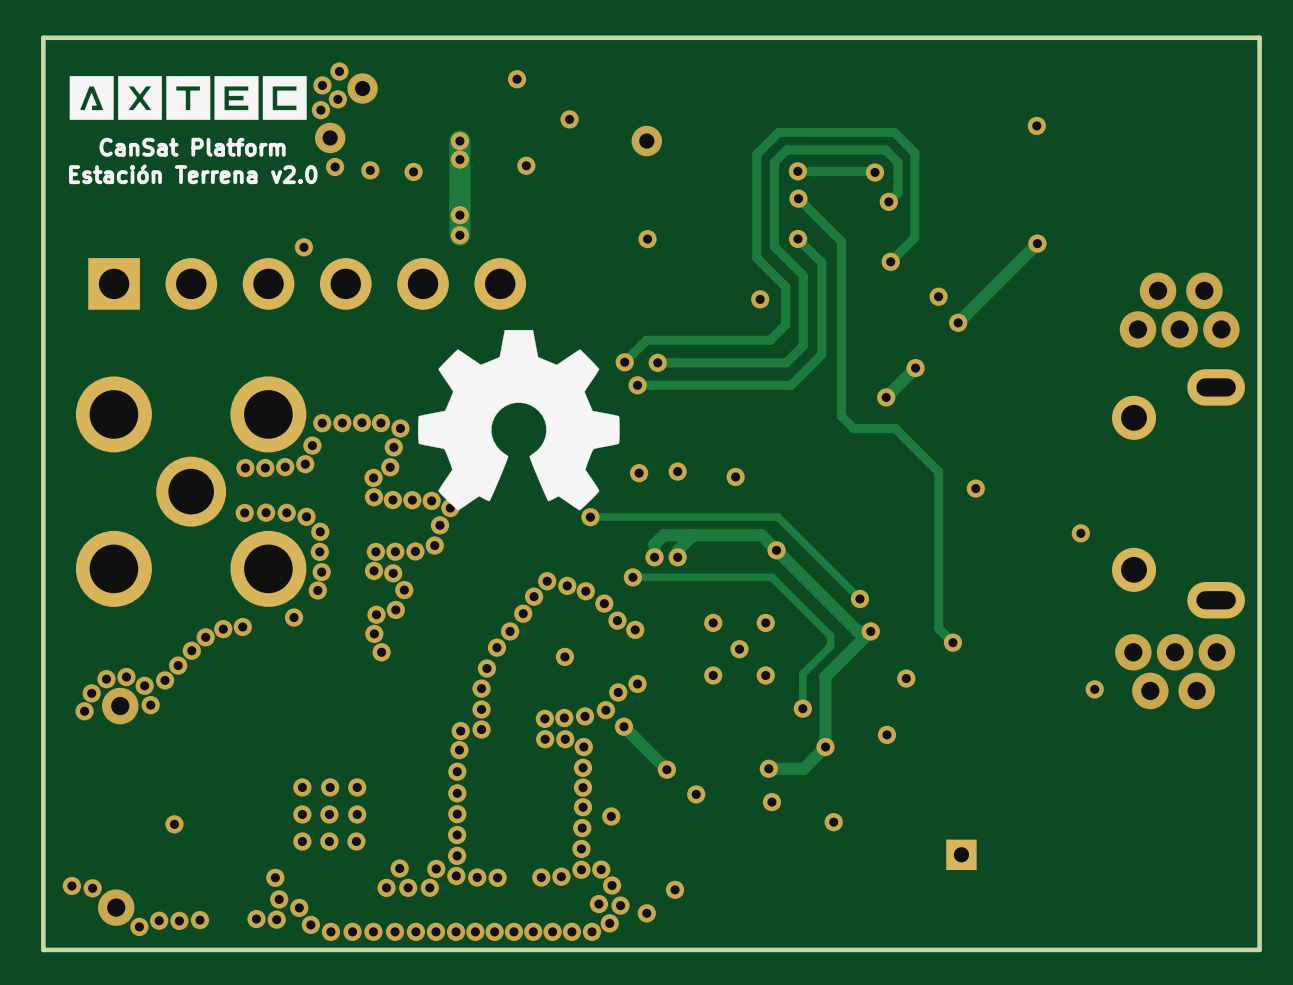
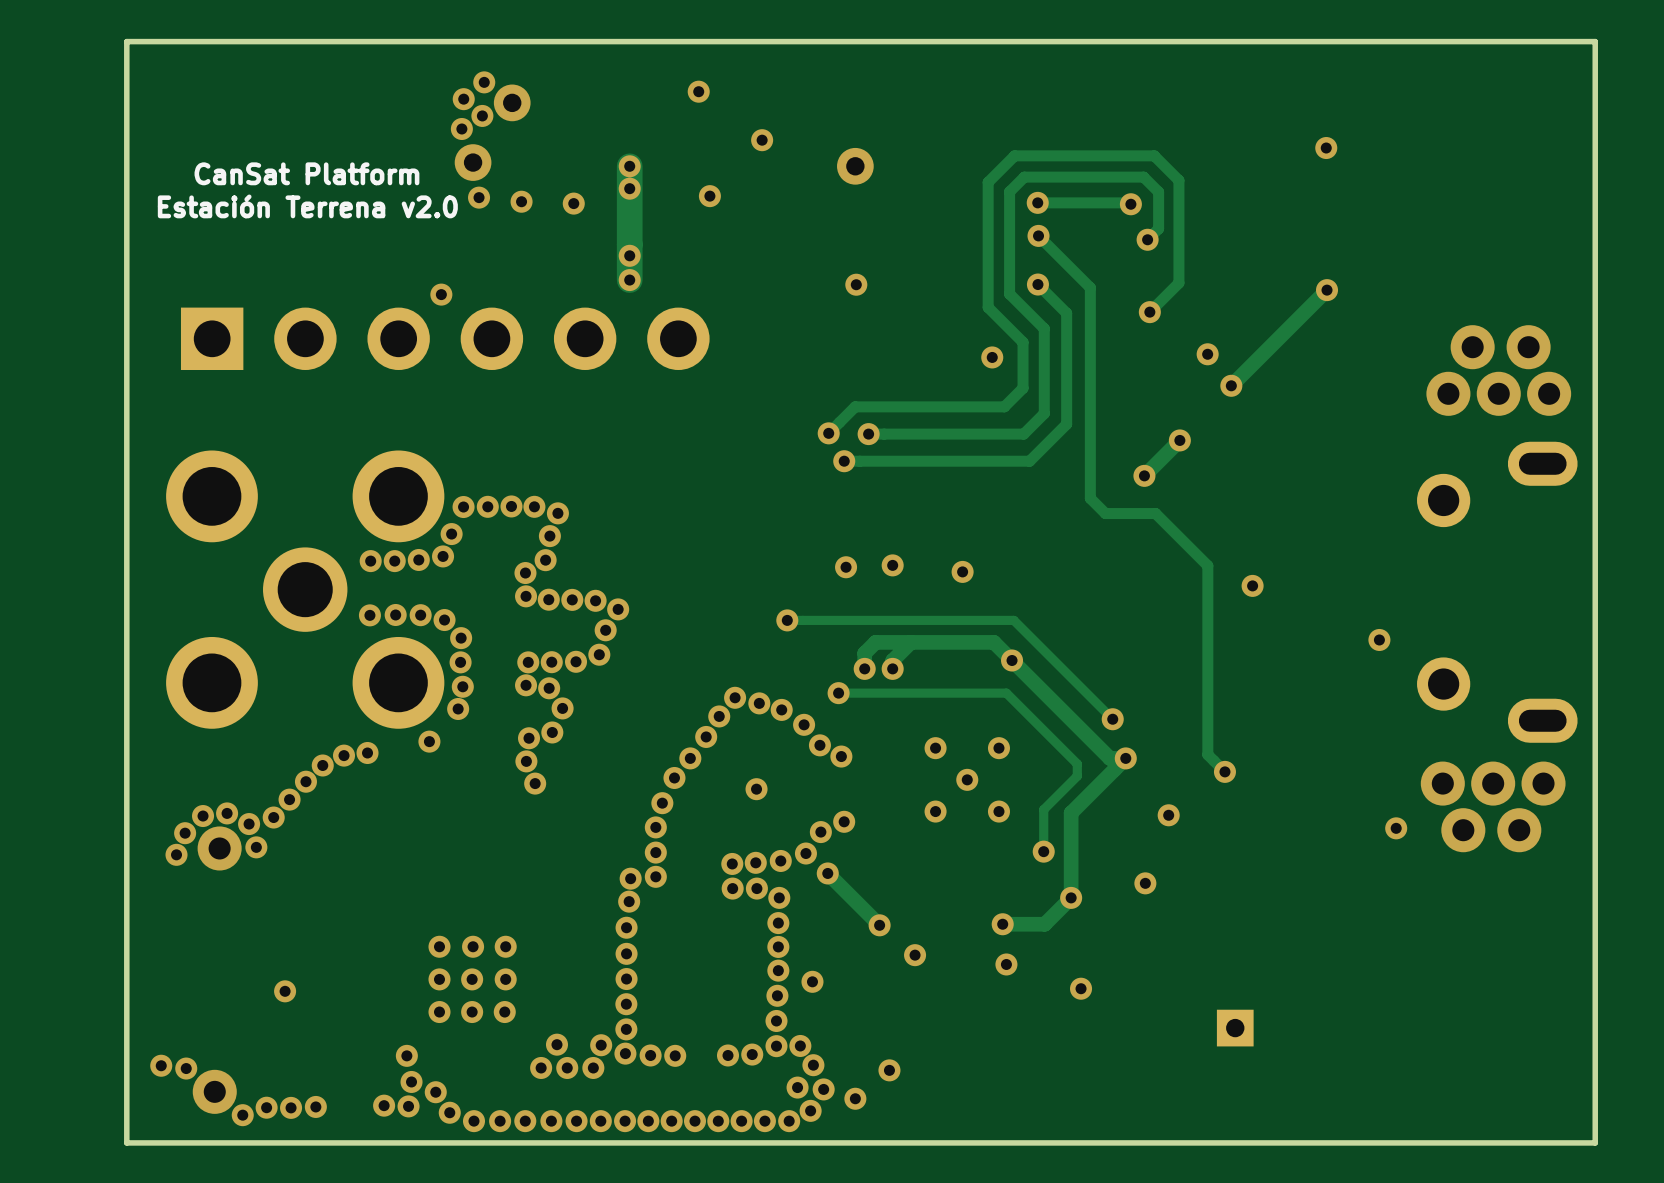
drawing: [69, 76, 307, 120] -> none
drawing: [418, 329, 620, 511] -> none

